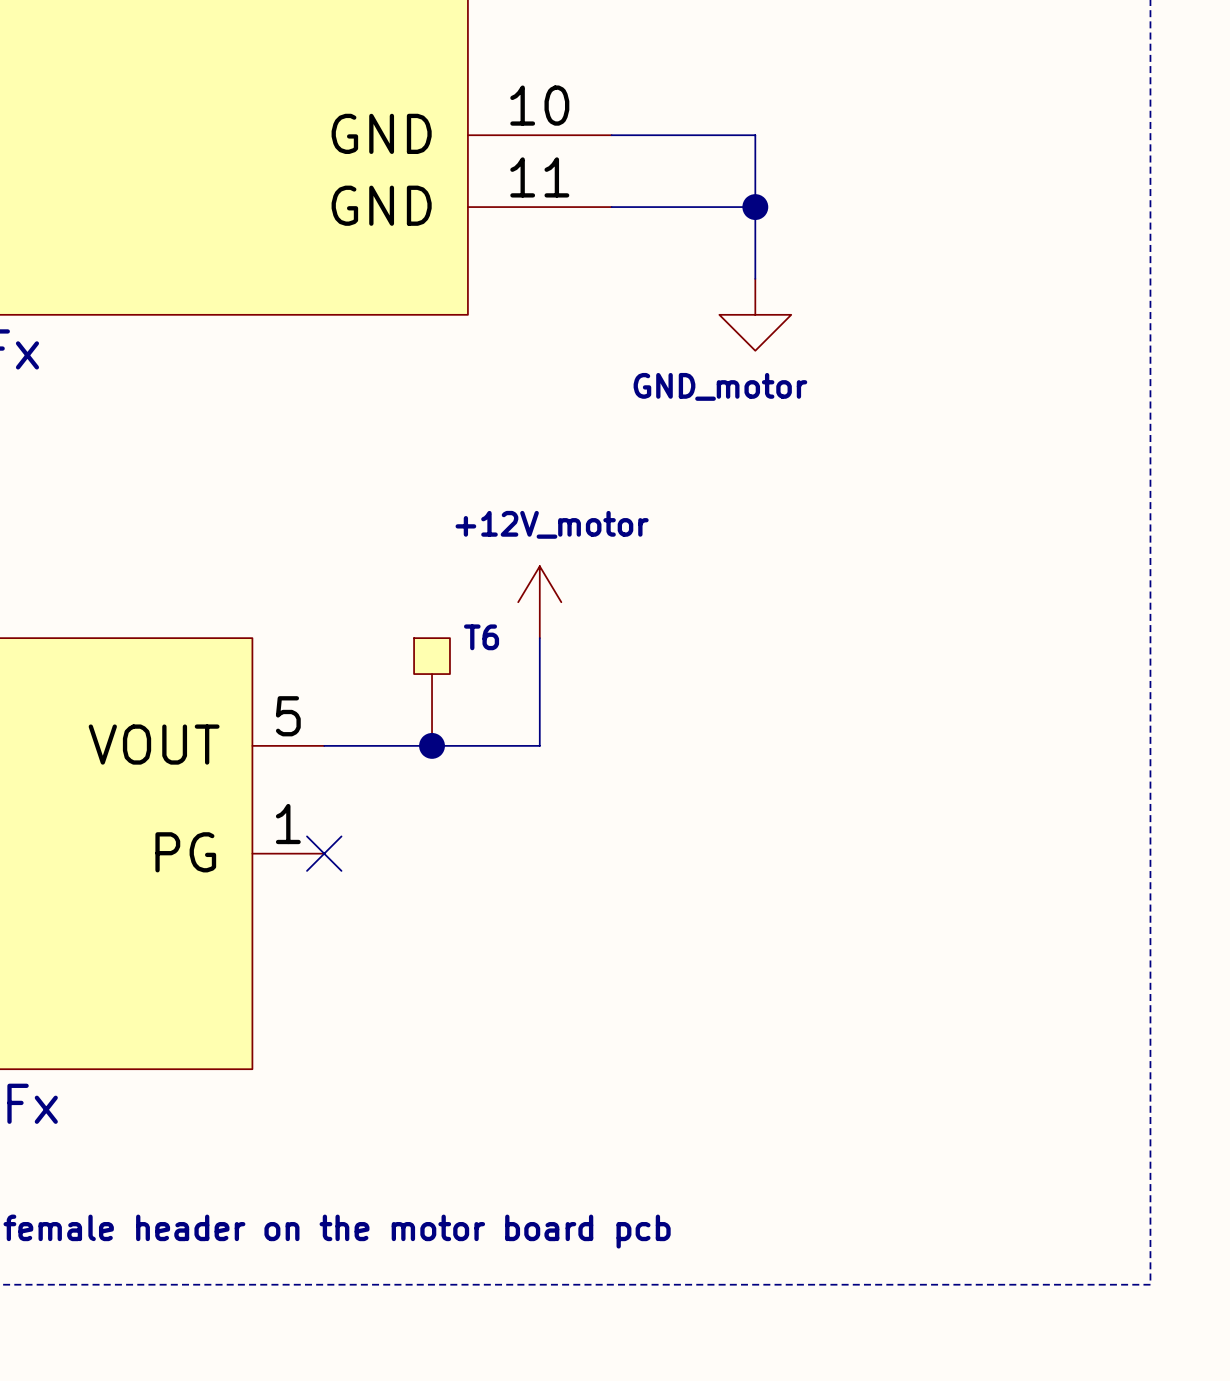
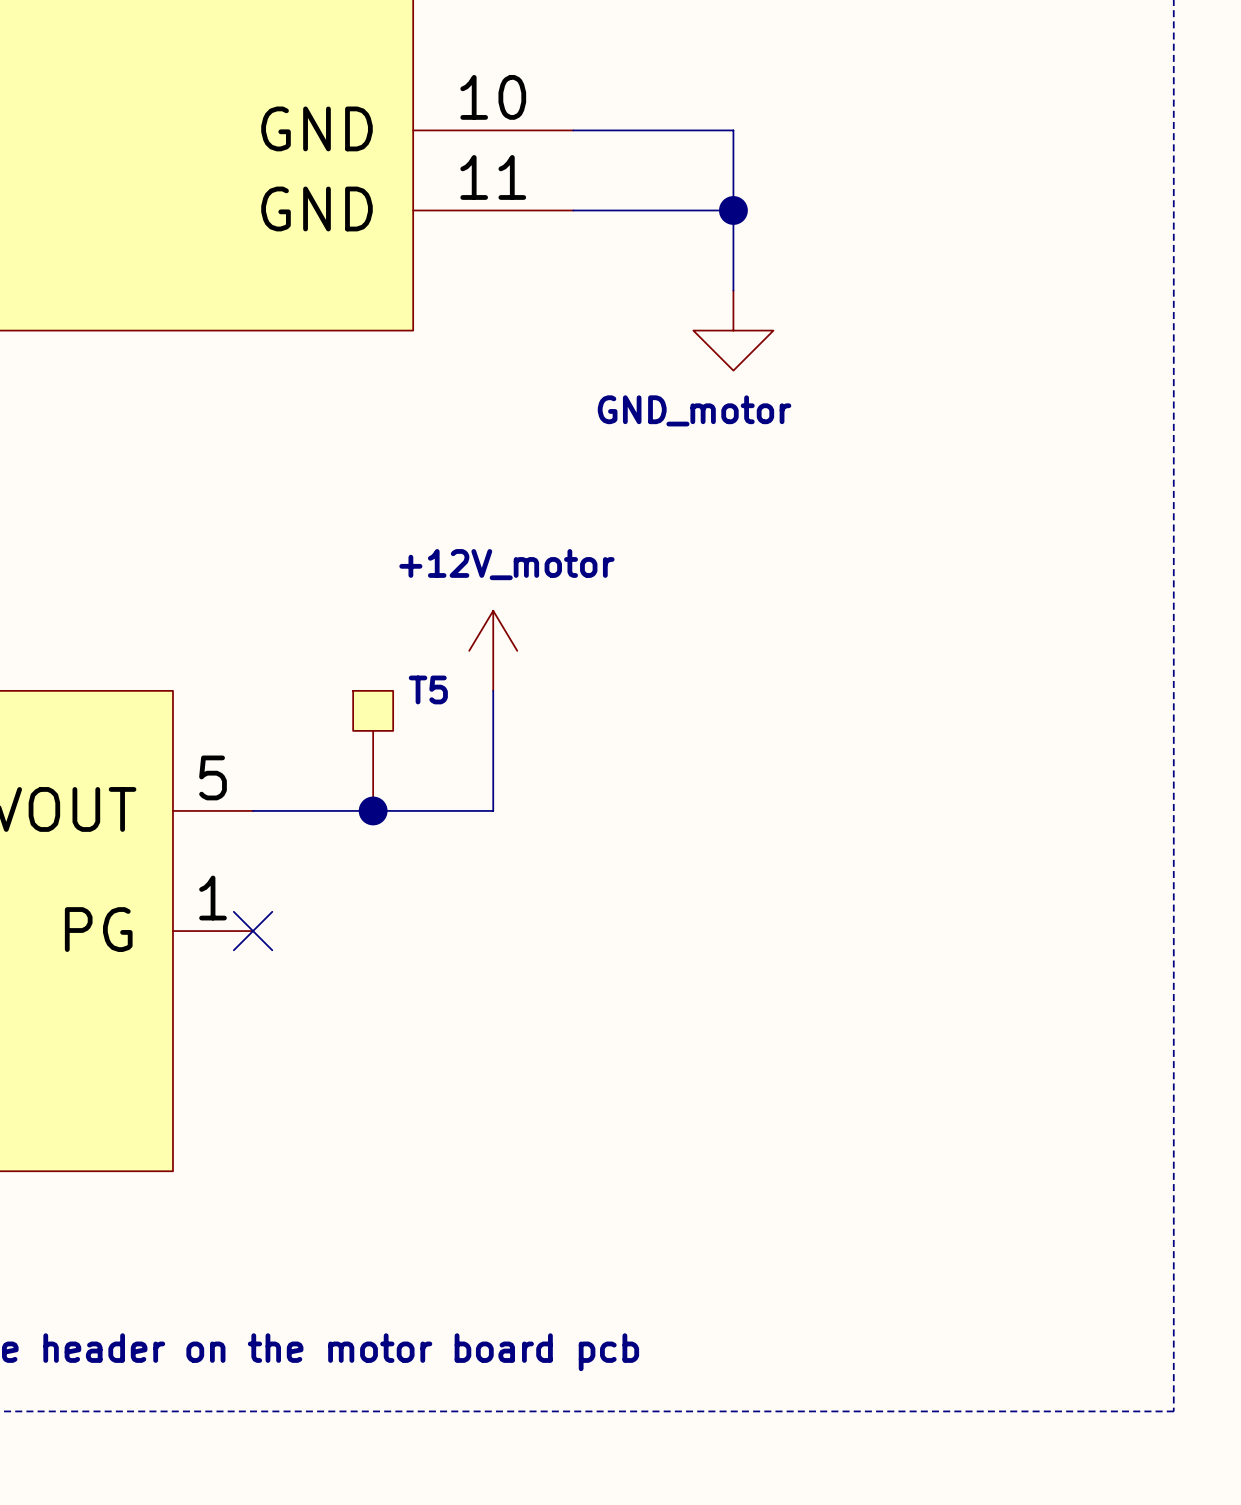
T6 name: T6 (481, 637) -> T5 (428, 689)

